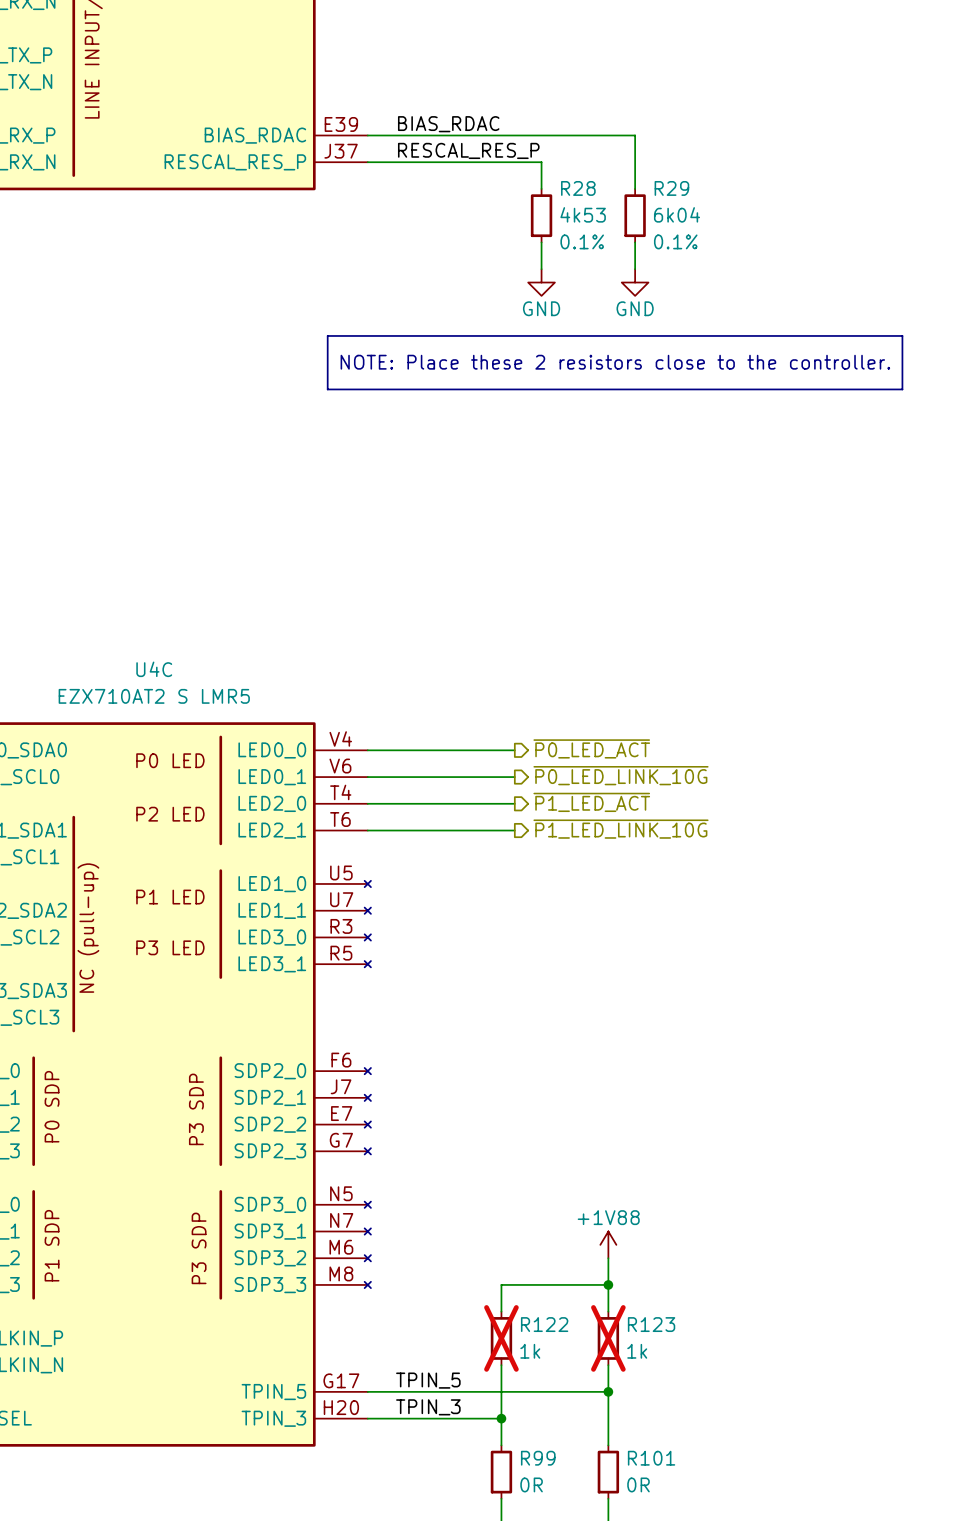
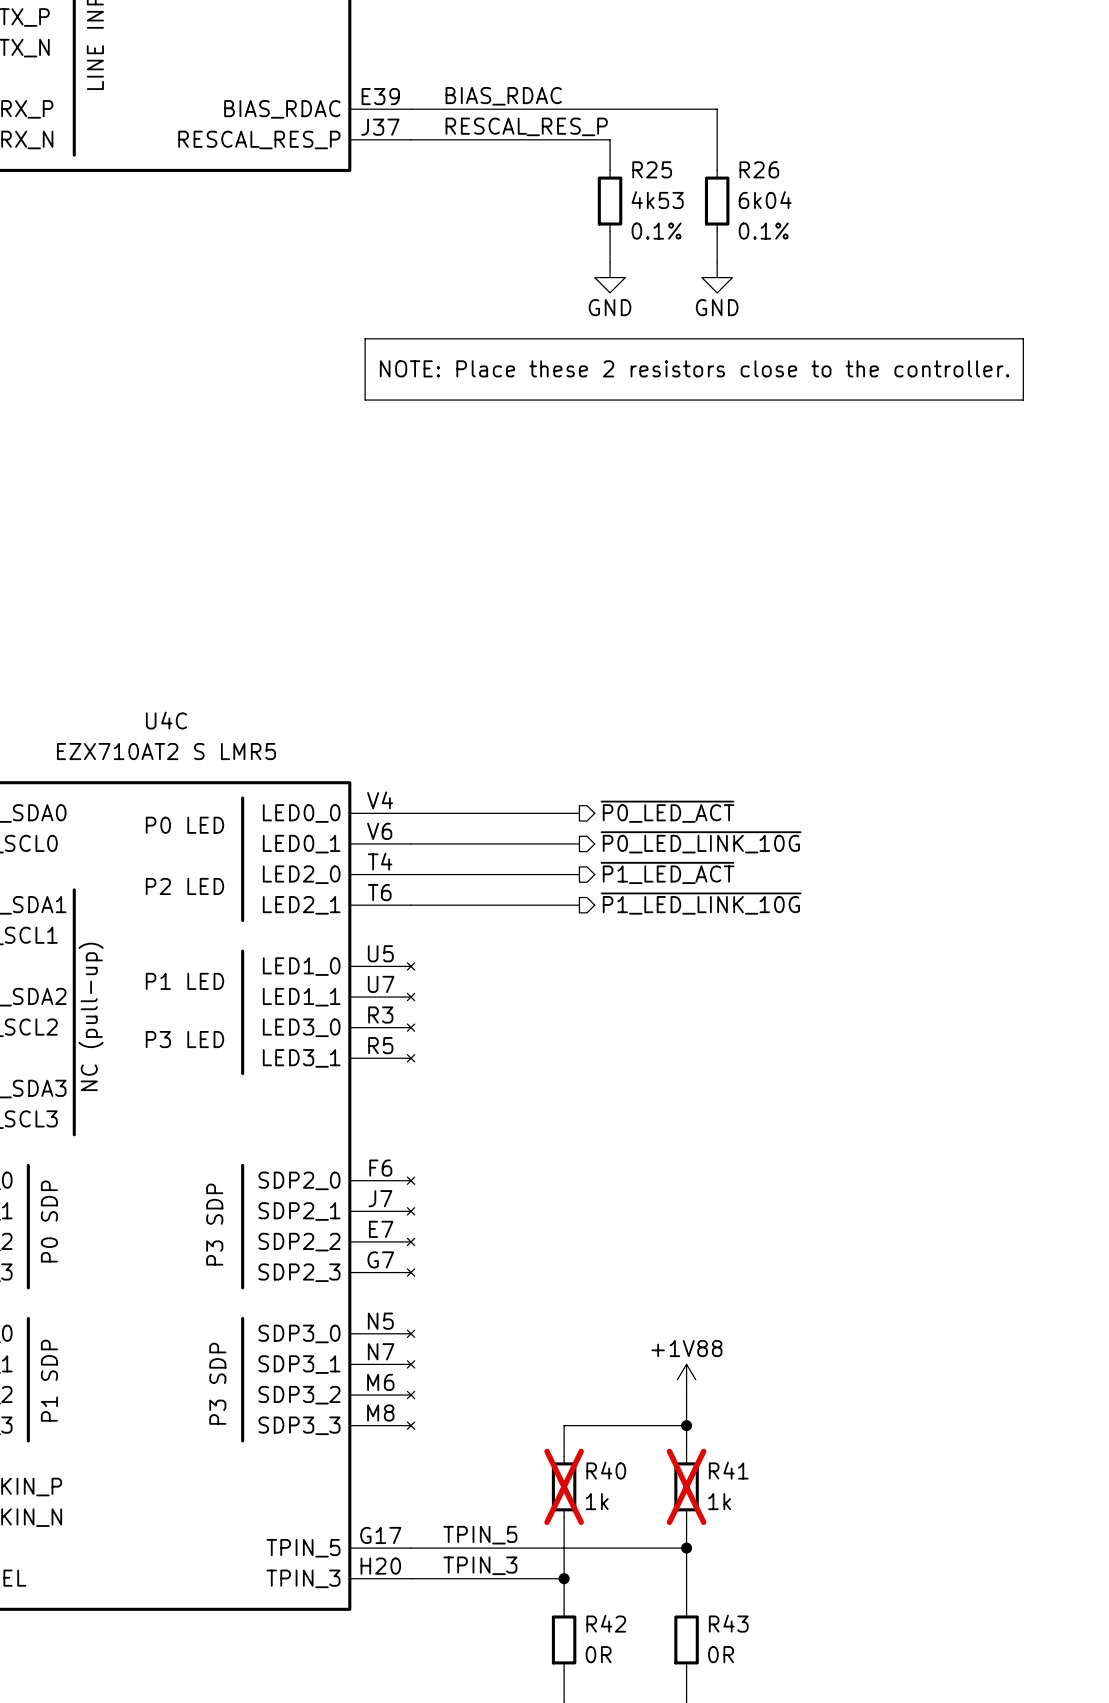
R28 name: R28 (578, 188) -> R25 (652, 169)
R29 name: R29 (671, 188) -> R26 (759, 169)
R122 name: R122 (544, 1324) -> R40 (606, 1470)
R123 name: R123 (651, 1324) -> R41 (728, 1470)
R99 name: R99 (538, 1458) -> R42 (606, 1623)
R101 name: R101 (651, 1458) -> R43 (728, 1623)

